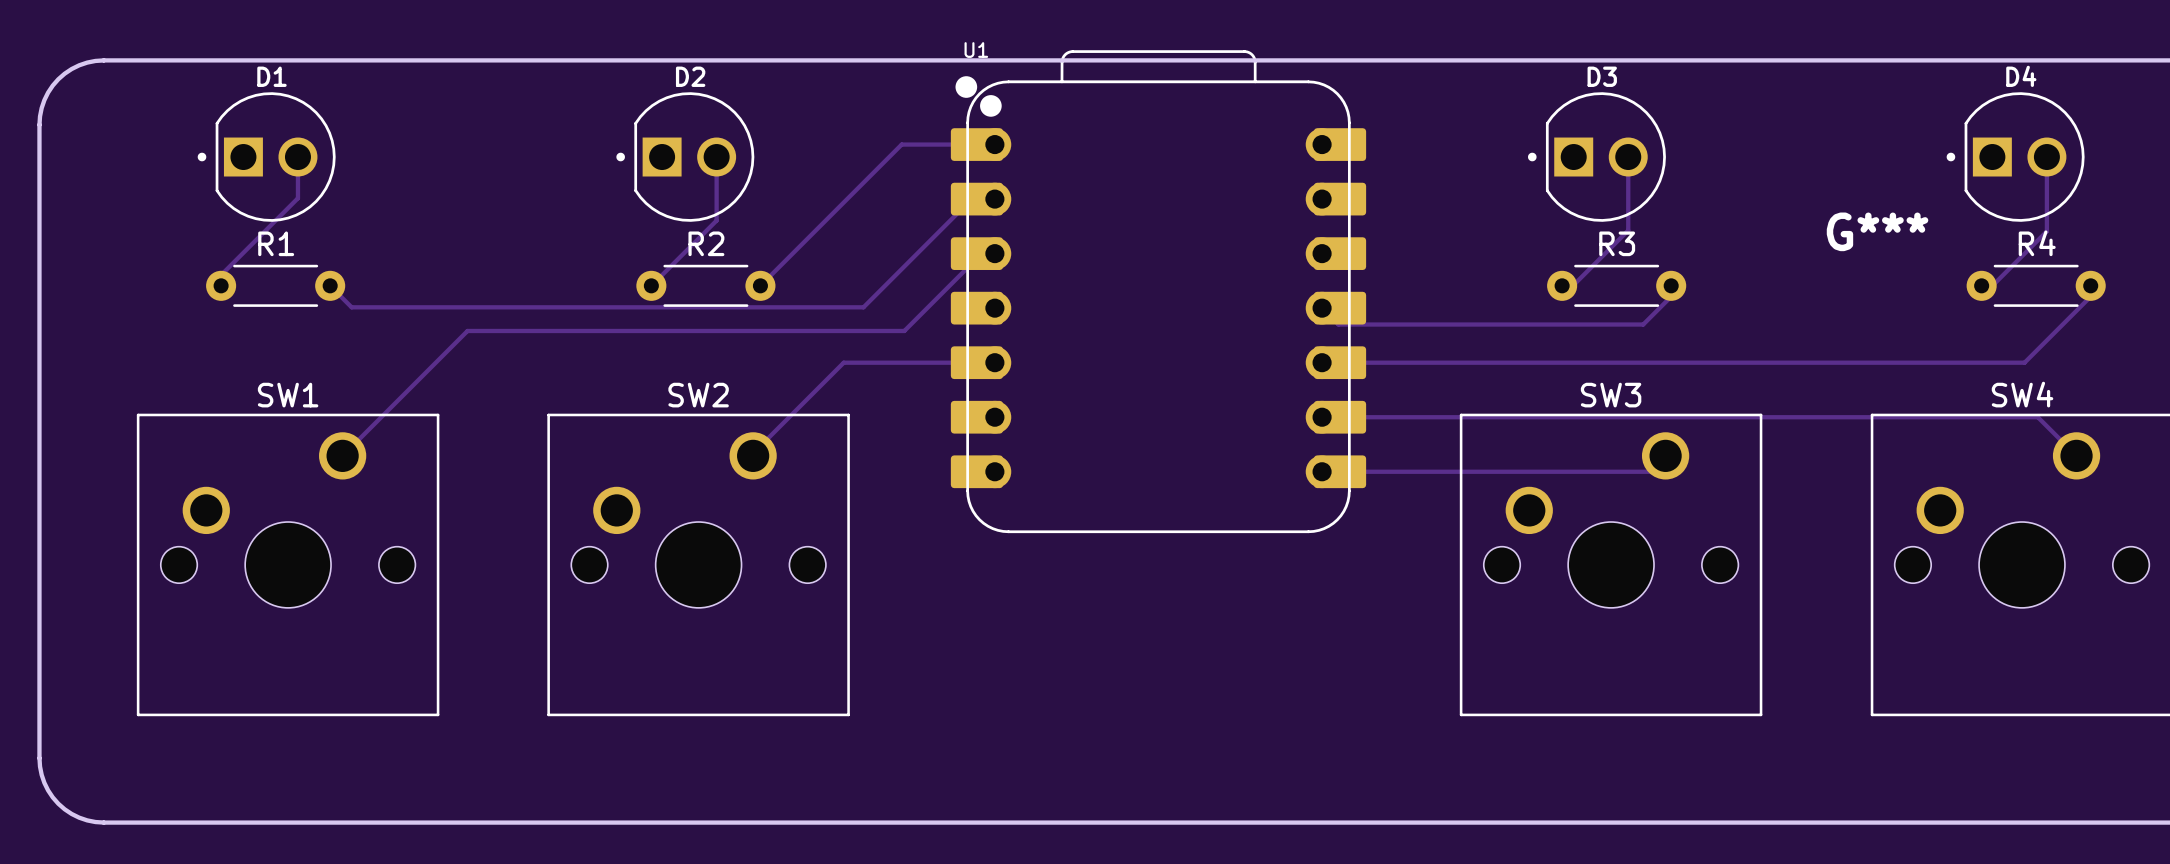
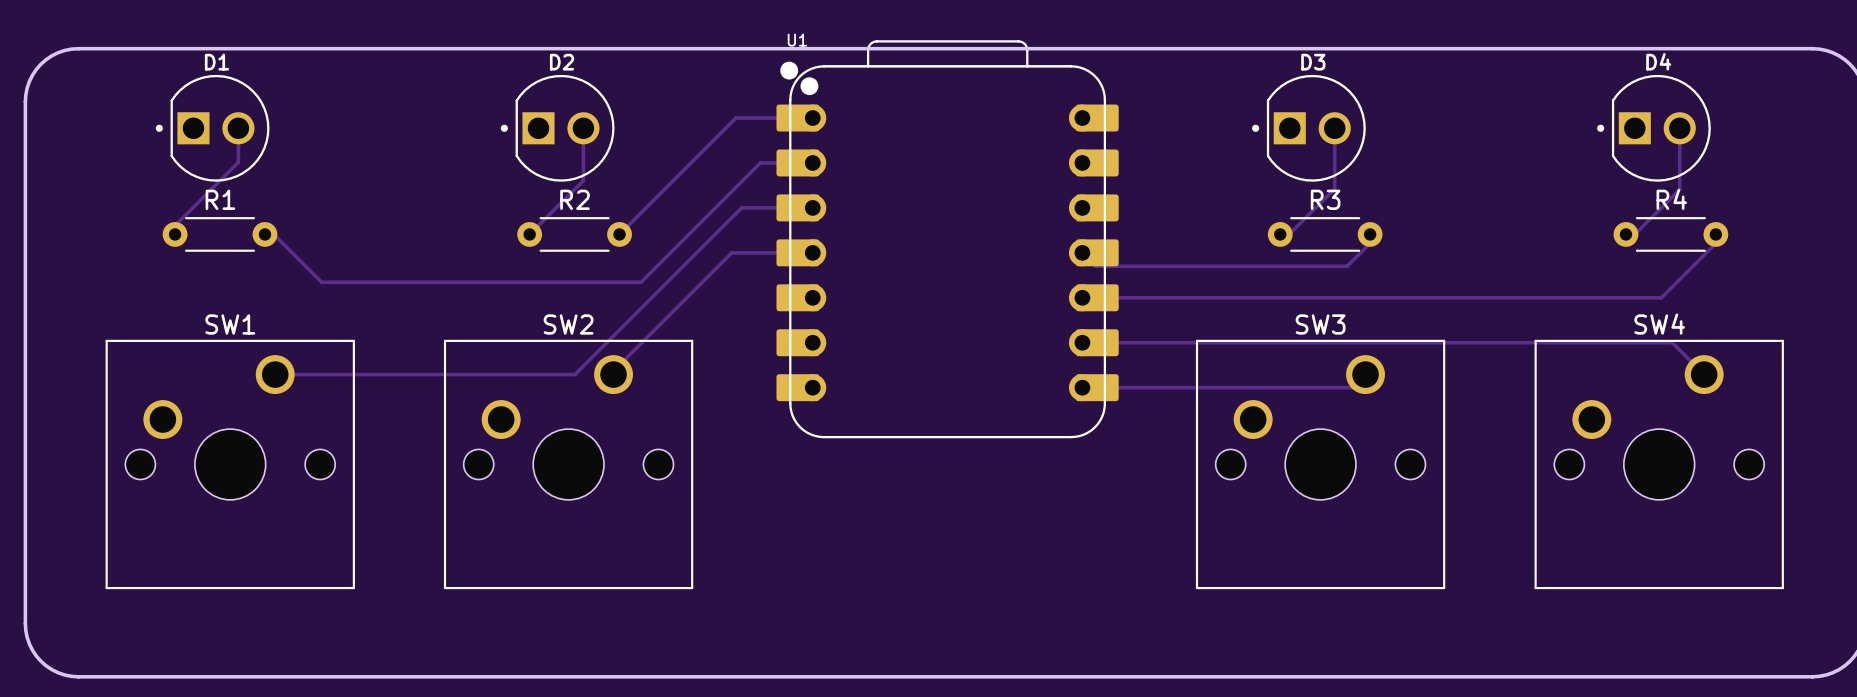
track: (971, 199) (863, 307) (351, 307) (330, 285) -> (793, 162) (760, 162) (641, 282) (321, 282) (264, 225)
G***: (1877, 231) -> none
track: (981, 253) (904, 330) (467, 330) (342, 455) -> (801, 207) (741, 207) (574, 374) (275, 374)
track: none -> (812, 252) (731, 252) (609, 374)
track: (994, 362) (843, 362) (750, 455) -> none

